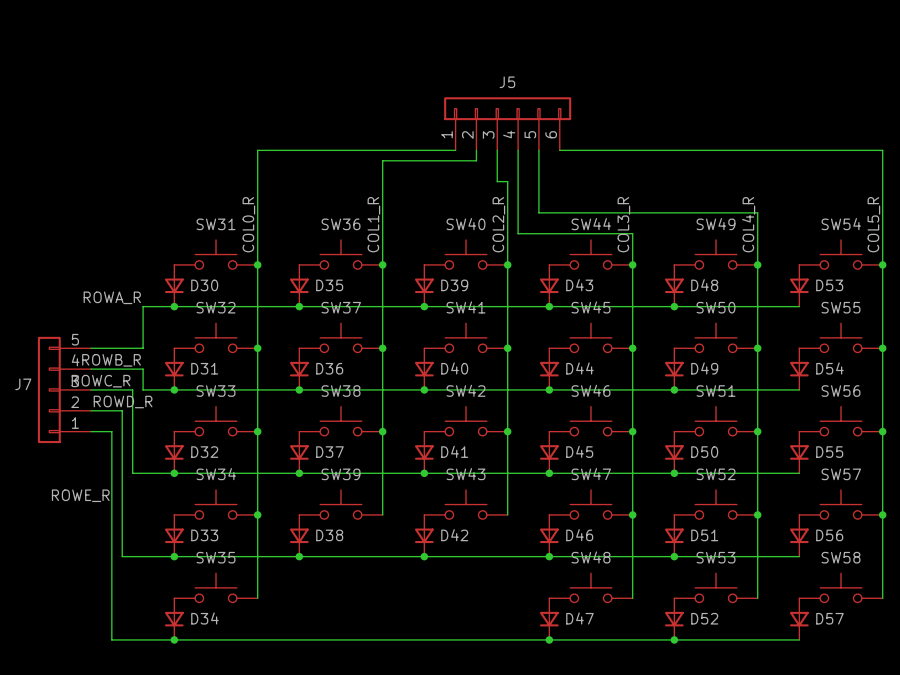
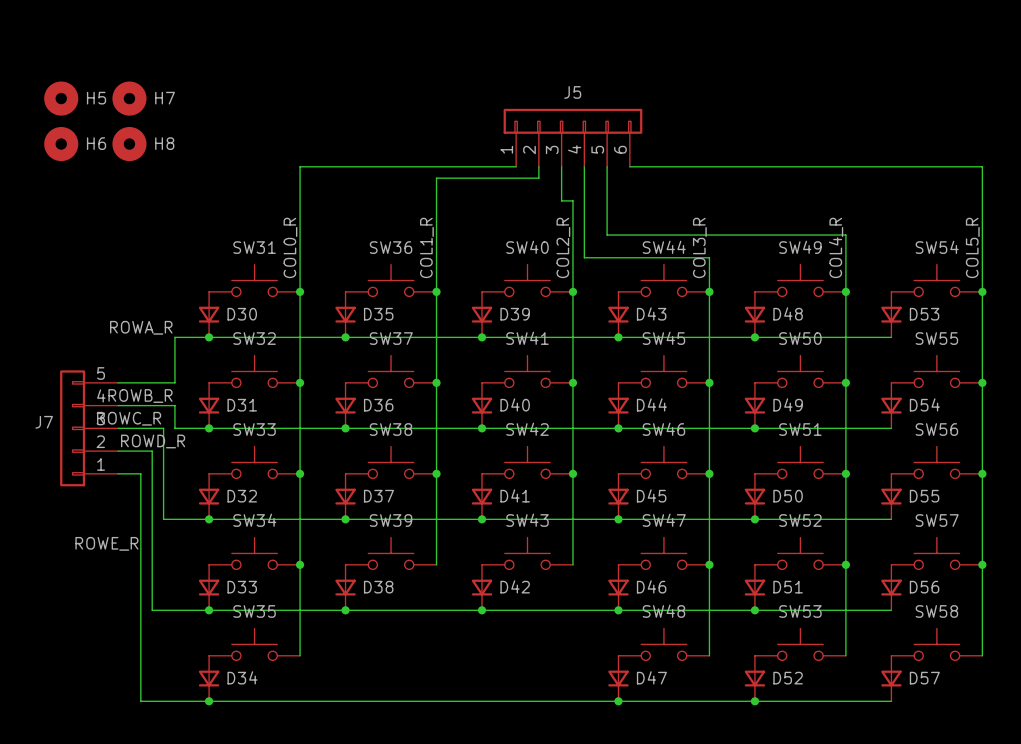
H5: none -> (61, 98)
H7: none -> (129, 98)
H6: none -> (61, 144)
H8: none -> (129, 144)

